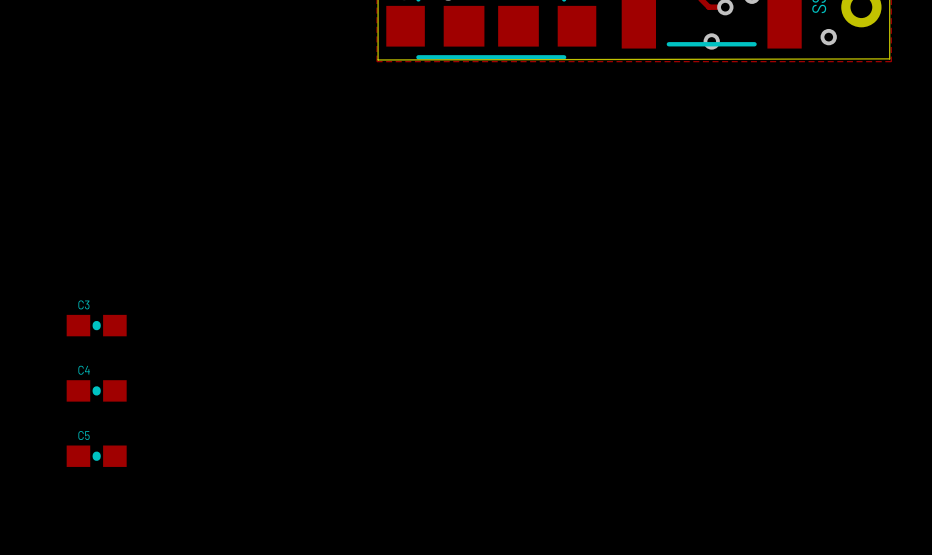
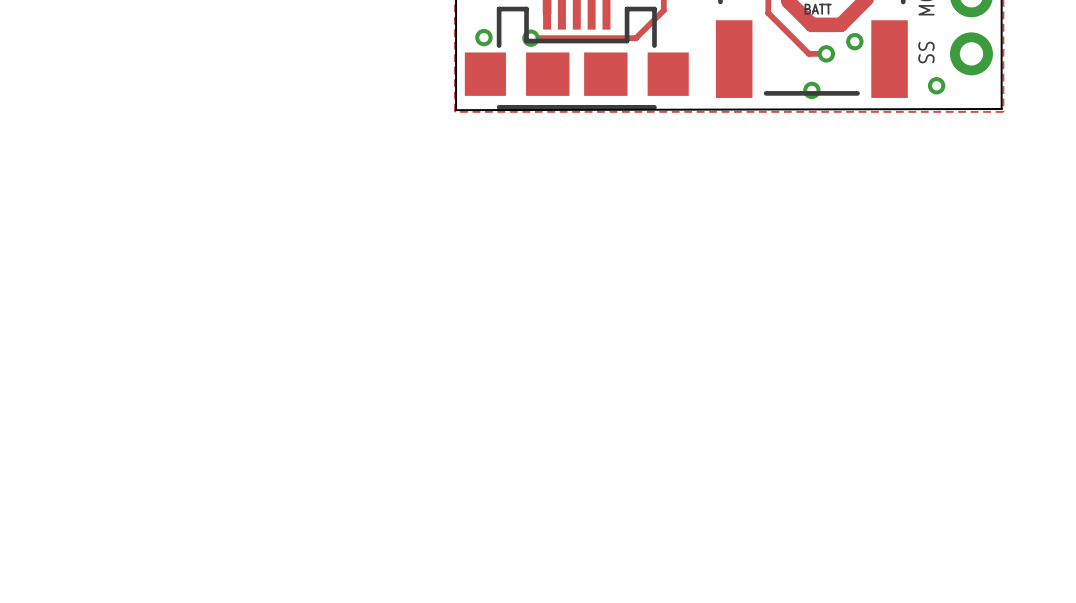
C3: (96, 325) -> none
C4: (96, 390) -> none
C5: (96, 456) -> none

